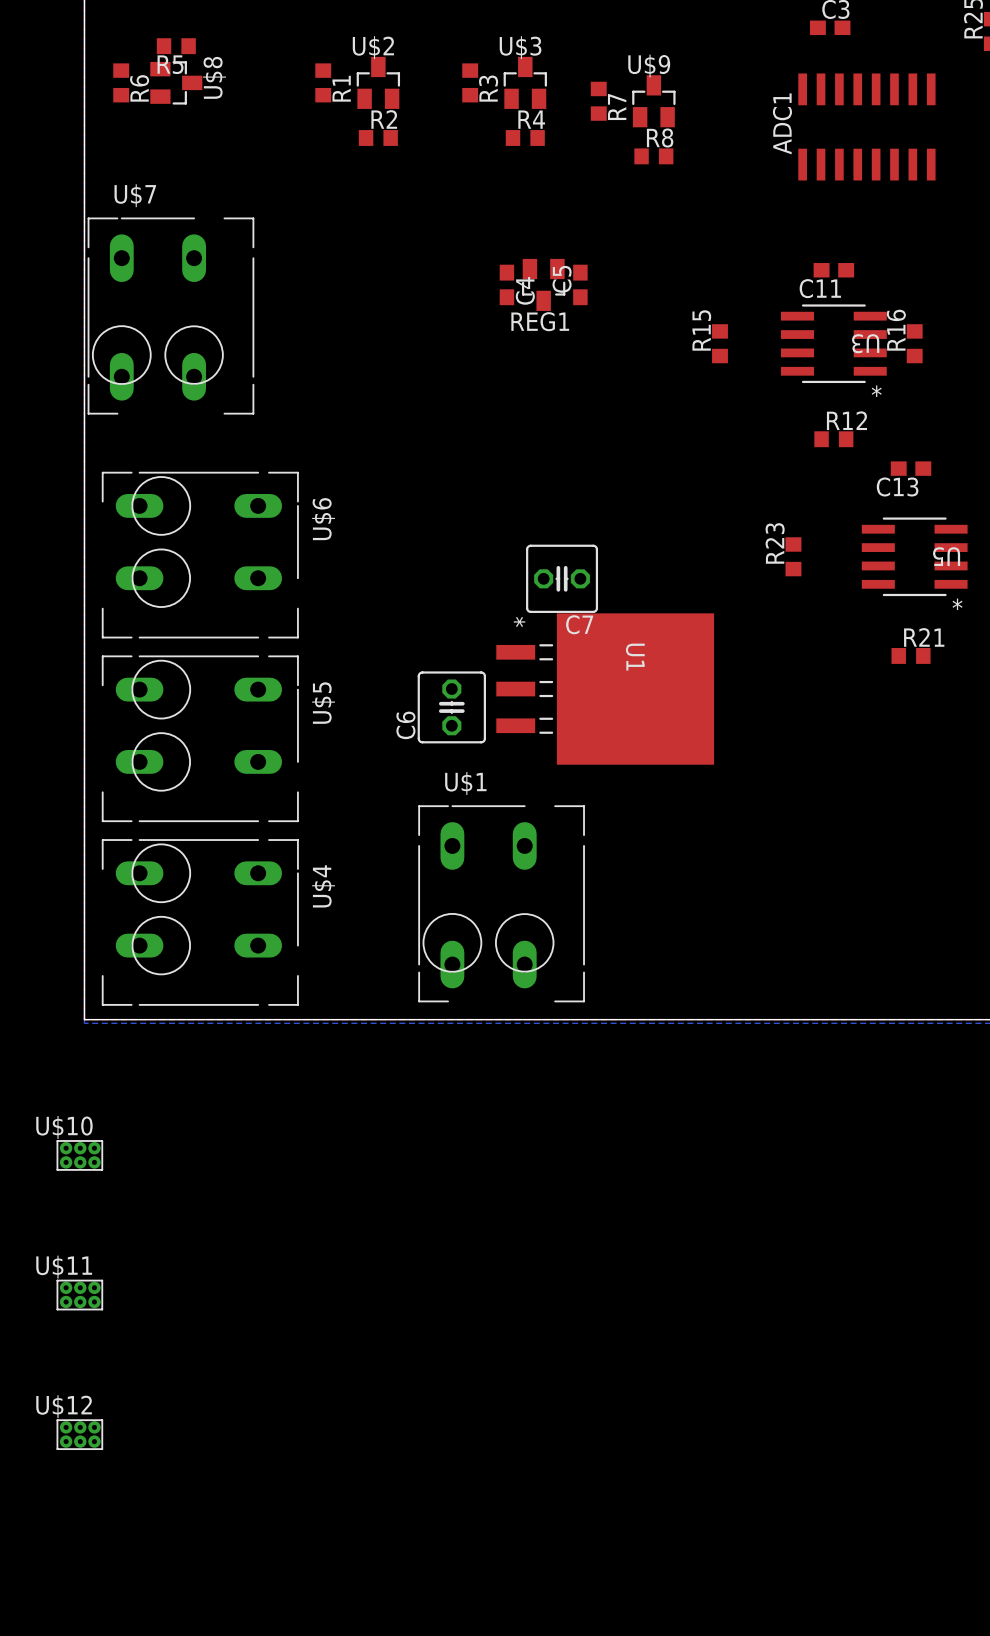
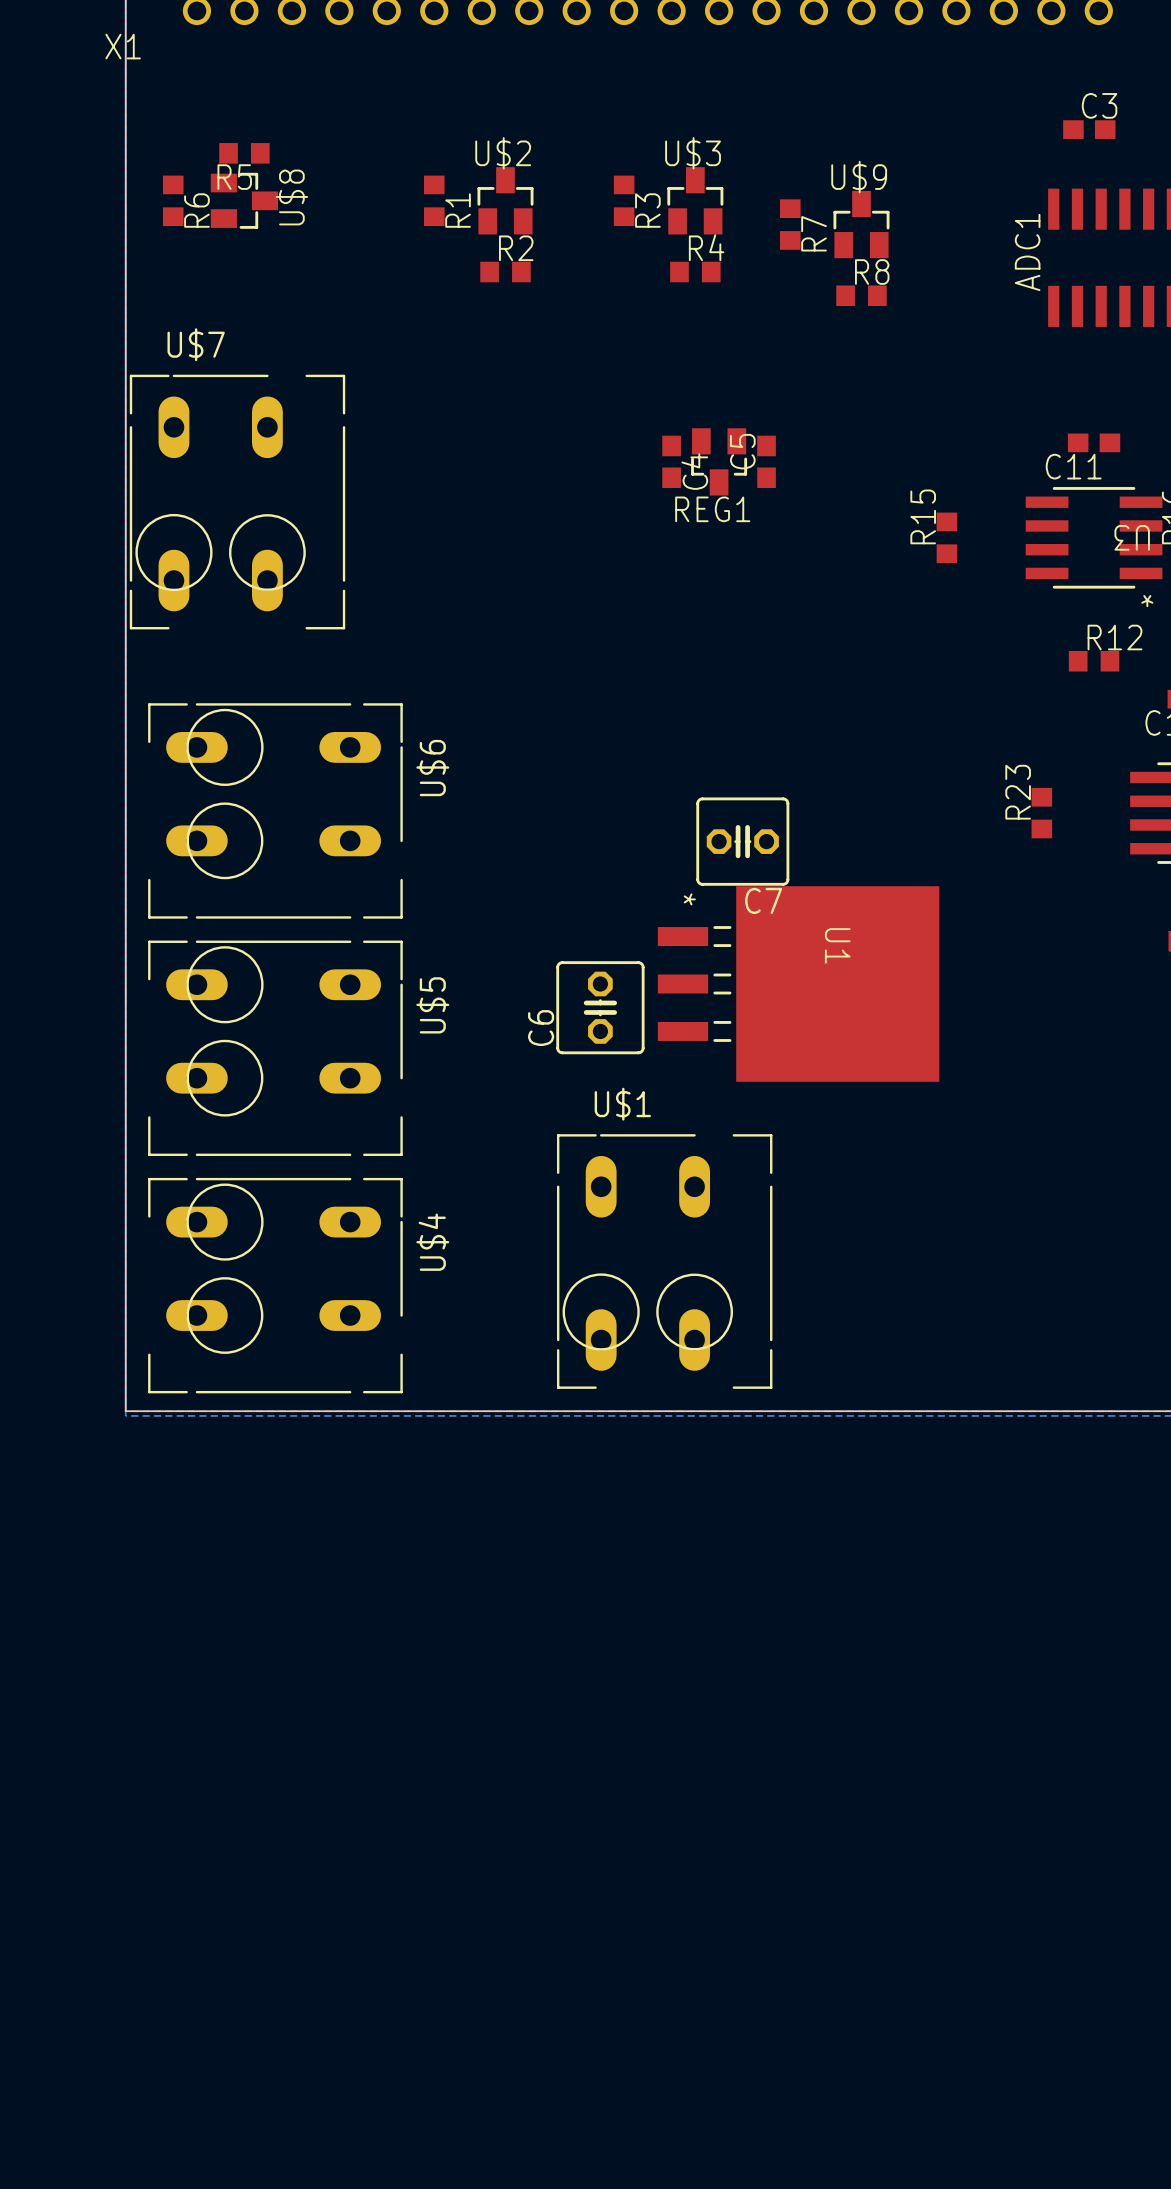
U$10: (79, 1155) -> none
U$11: (79, 1295) -> none
U$12: (79, 1434) -> none

